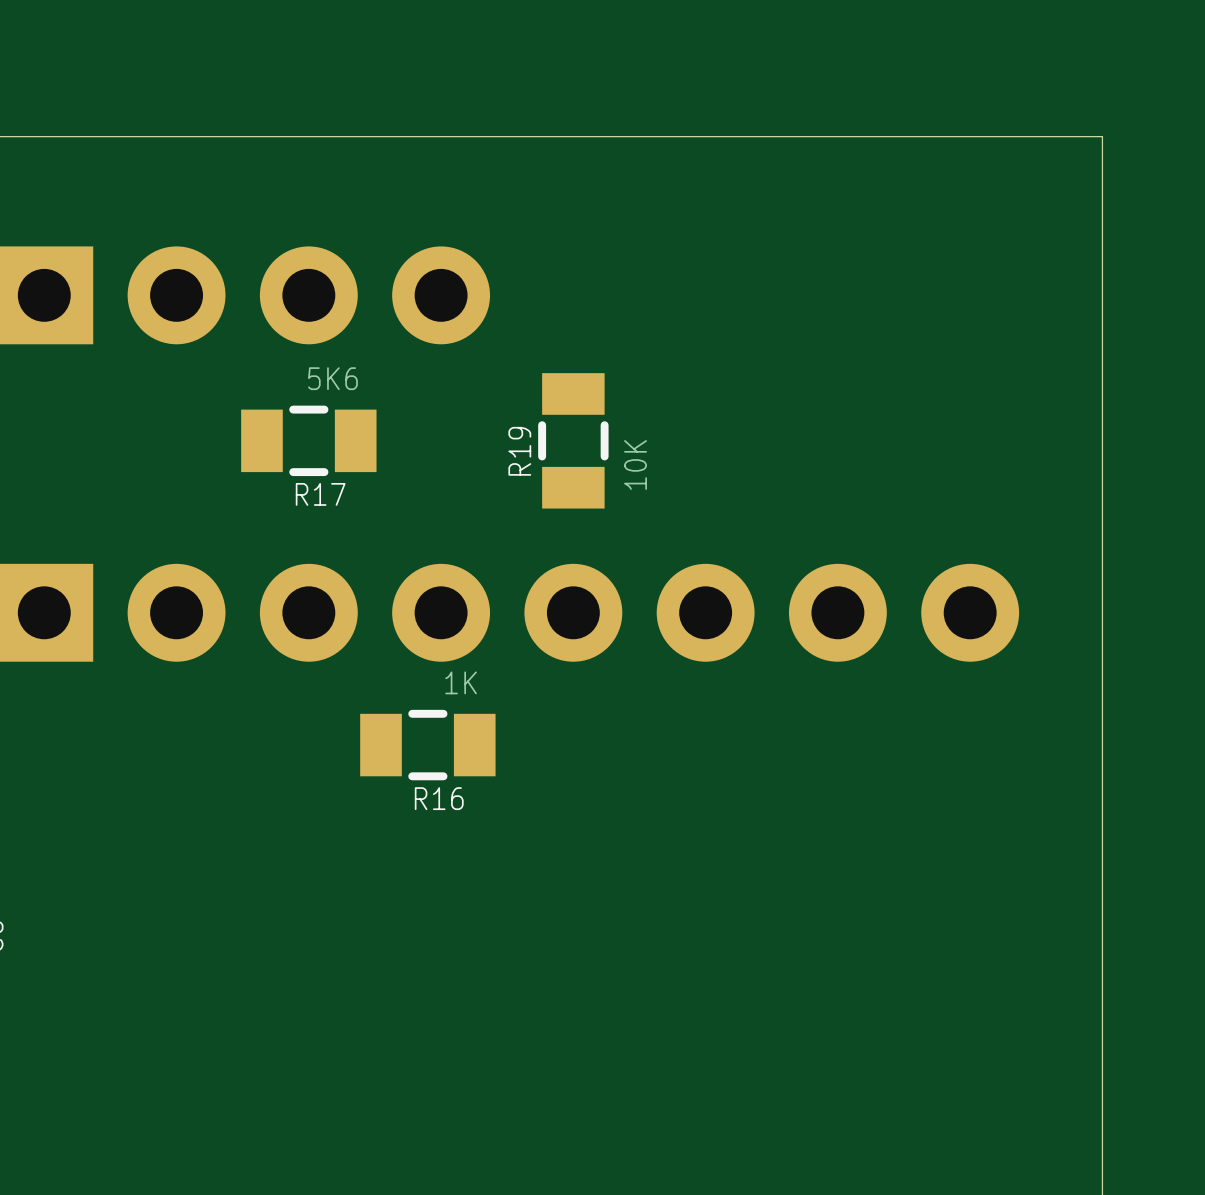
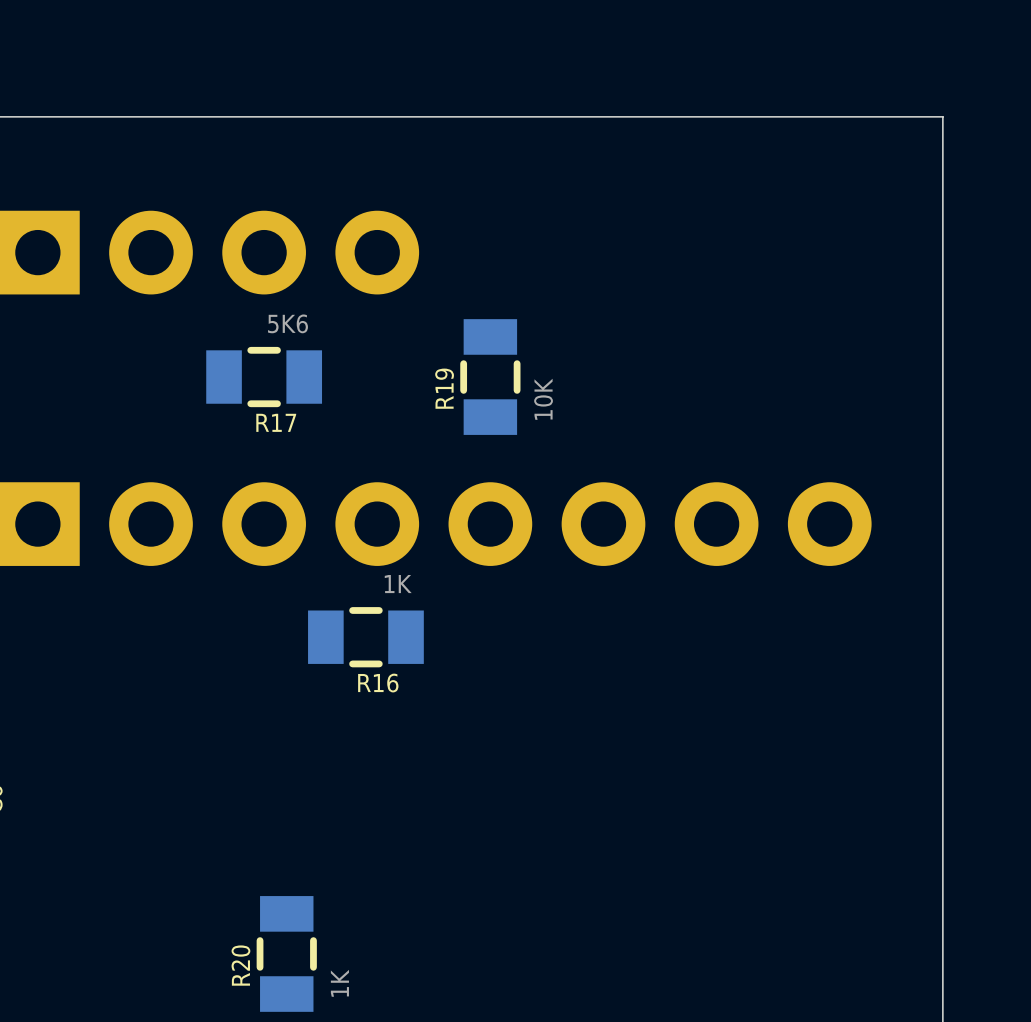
R20: none -> 1K (286, 953)

